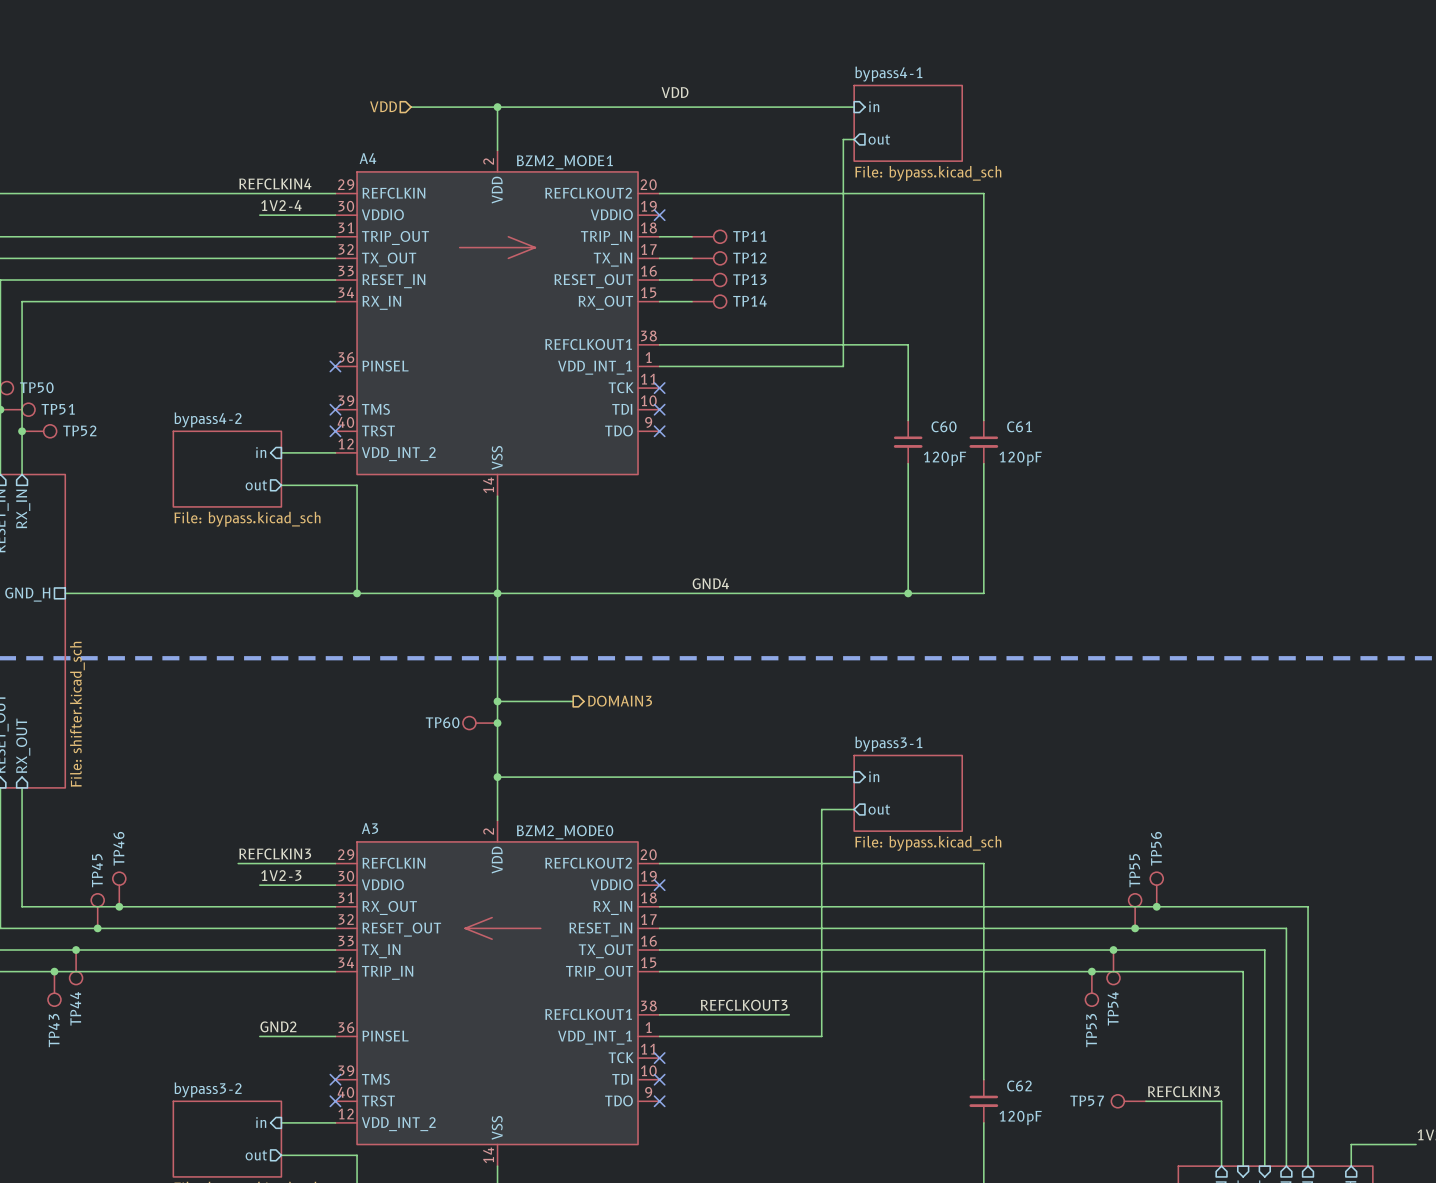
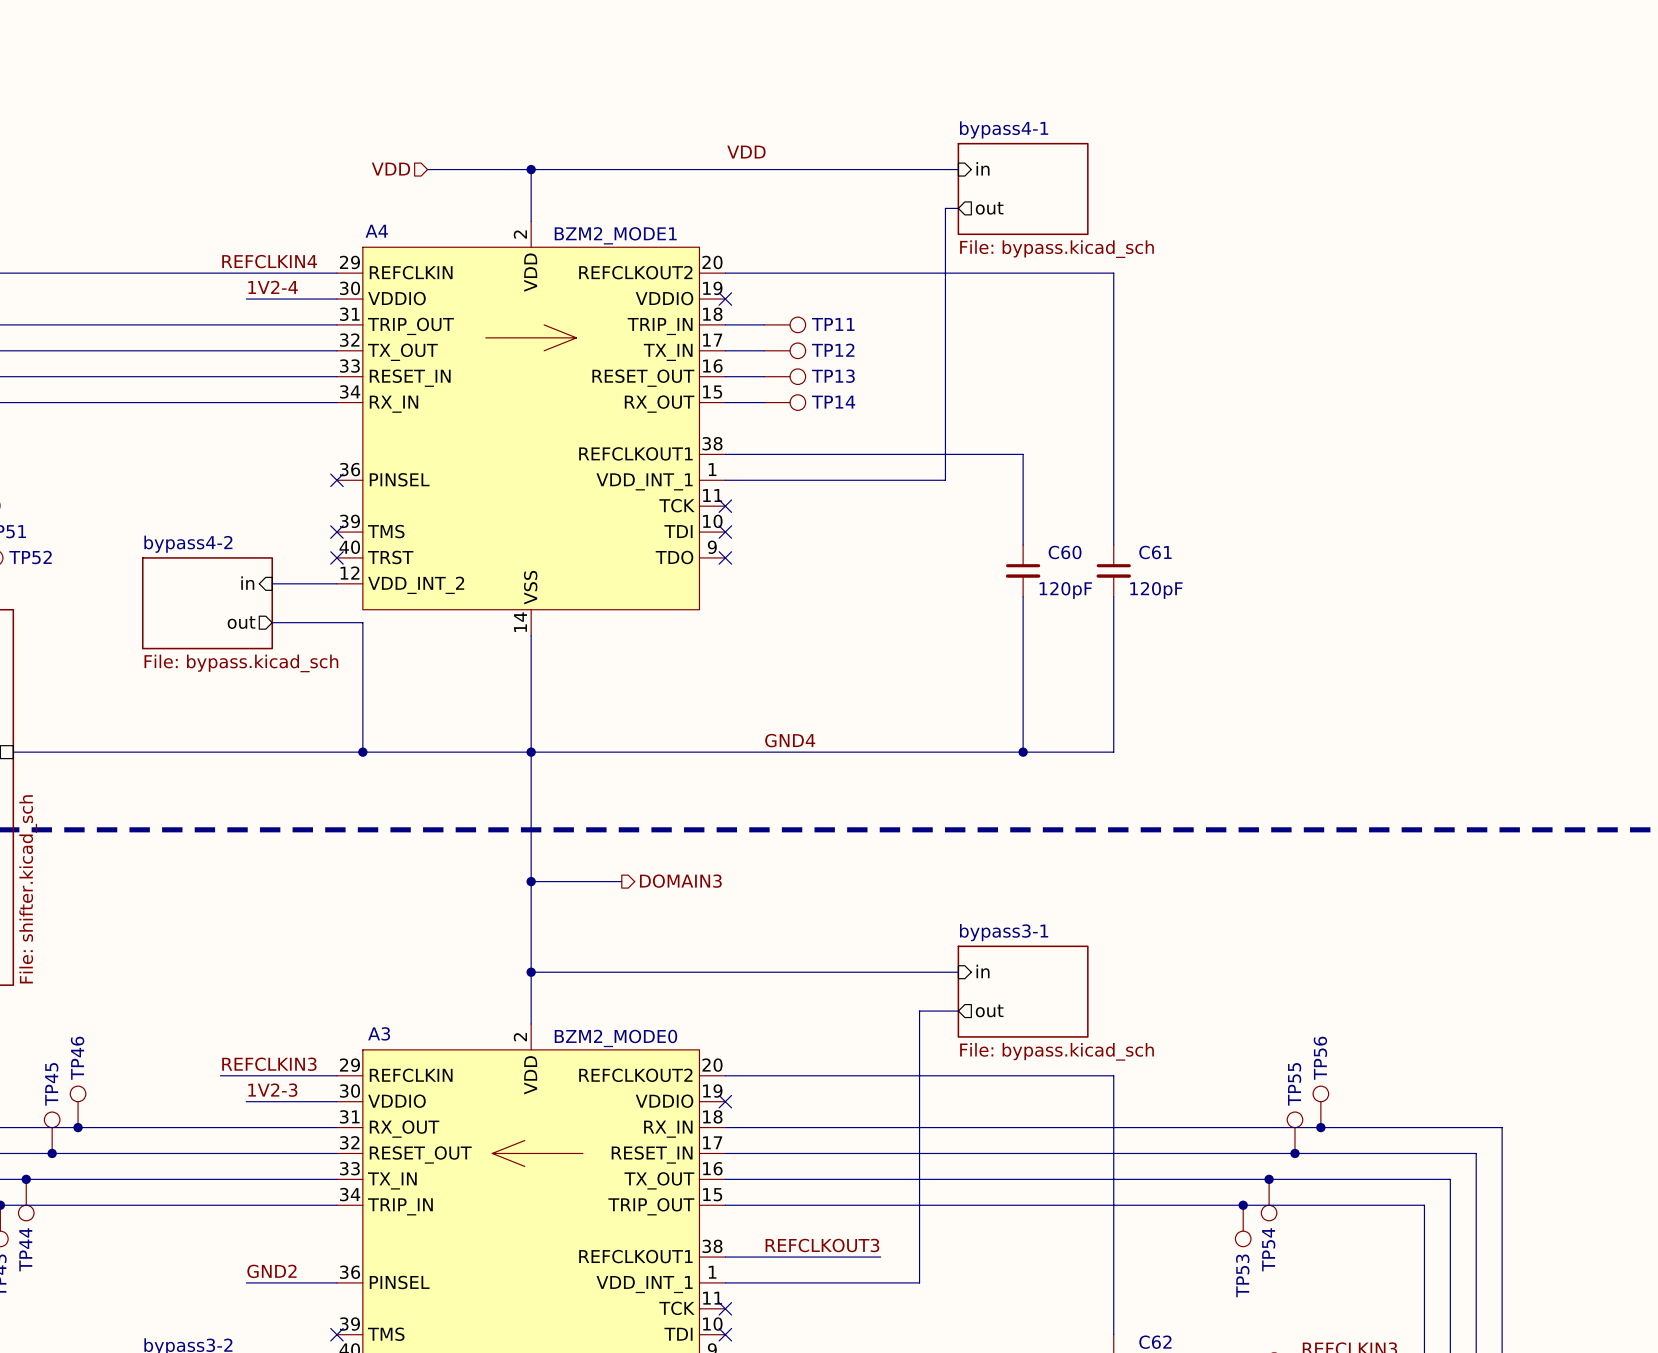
TP60: (480, 723) -> none
junction: (497, 723) -> none

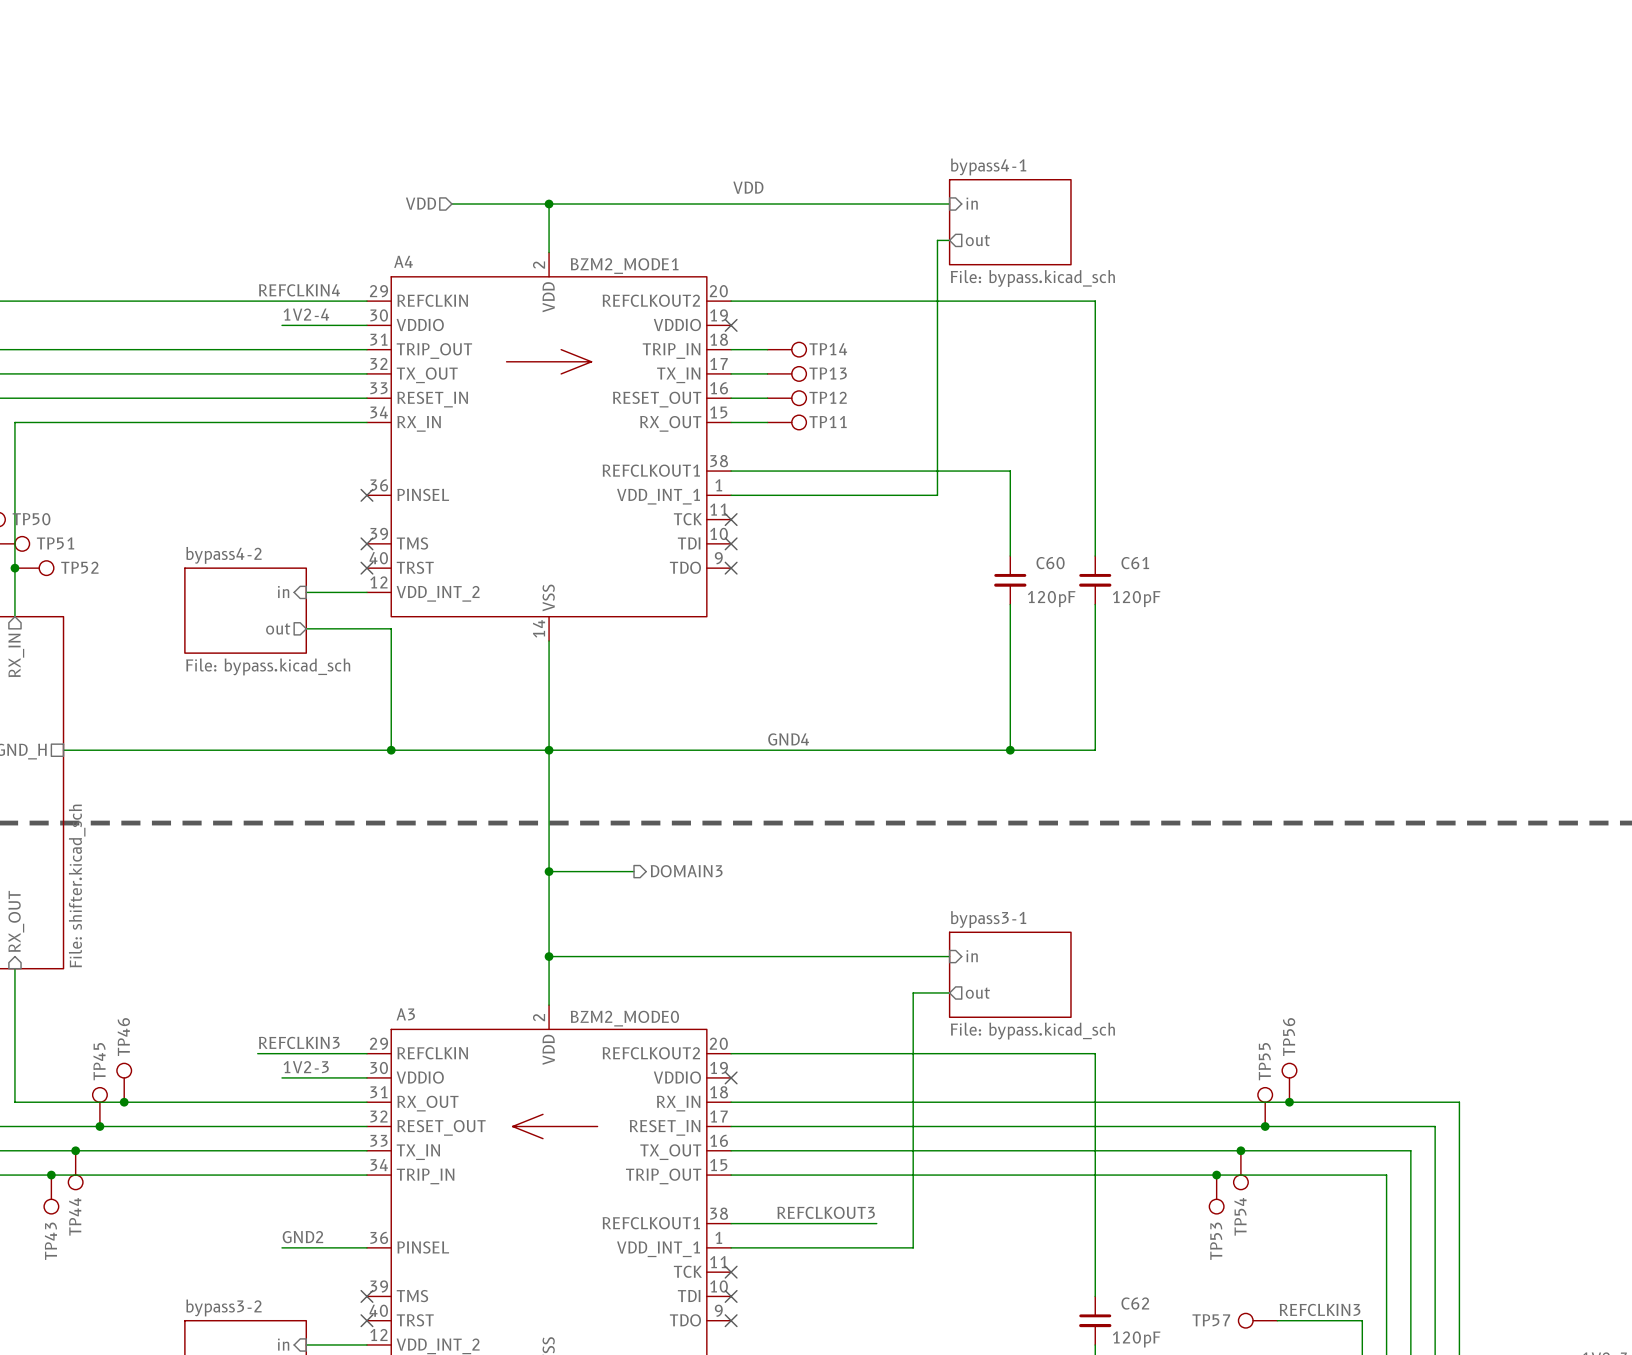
TP11 name: TP11 (833, 324) -> TP14 (828, 349)
TP12 name: TP12 (833, 350) -> TP13 (828, 373)
TP13 name: TP13 (833, 376) -> TP12 (828, 397)
TP14 name: TP14 (833, 402) -> TP11 (828, 422)

